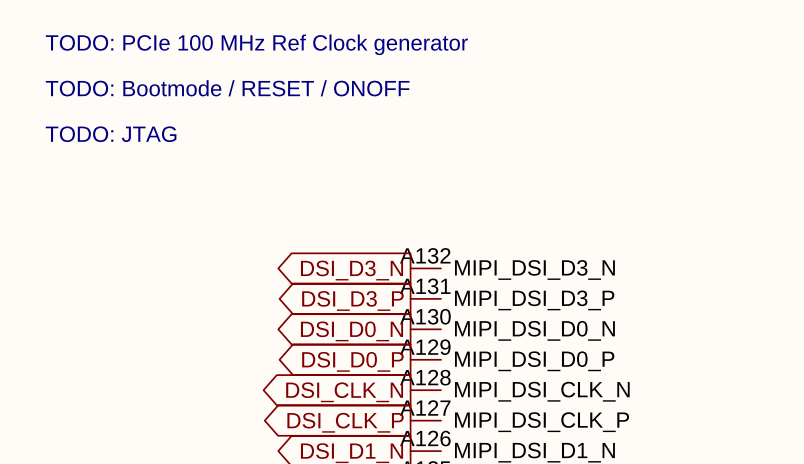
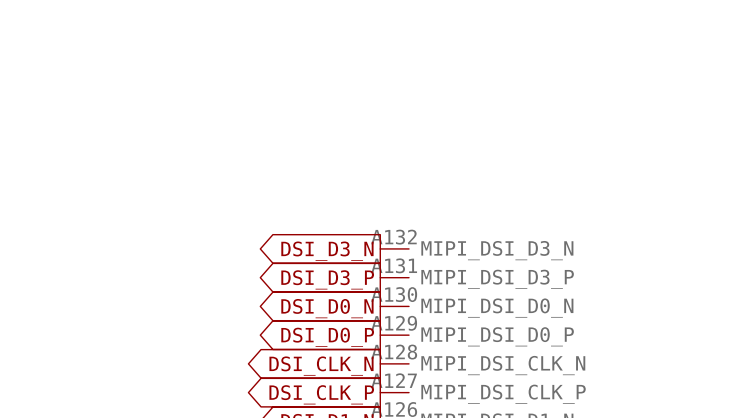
text: TODO: PCIe 100 MHz Ref Clock generator (256, 44) -> none
text: TODO: Bootmode / RESET / ONOFF (227, 88) -> none
text: TODO: JTAG (111, 134) -> none

